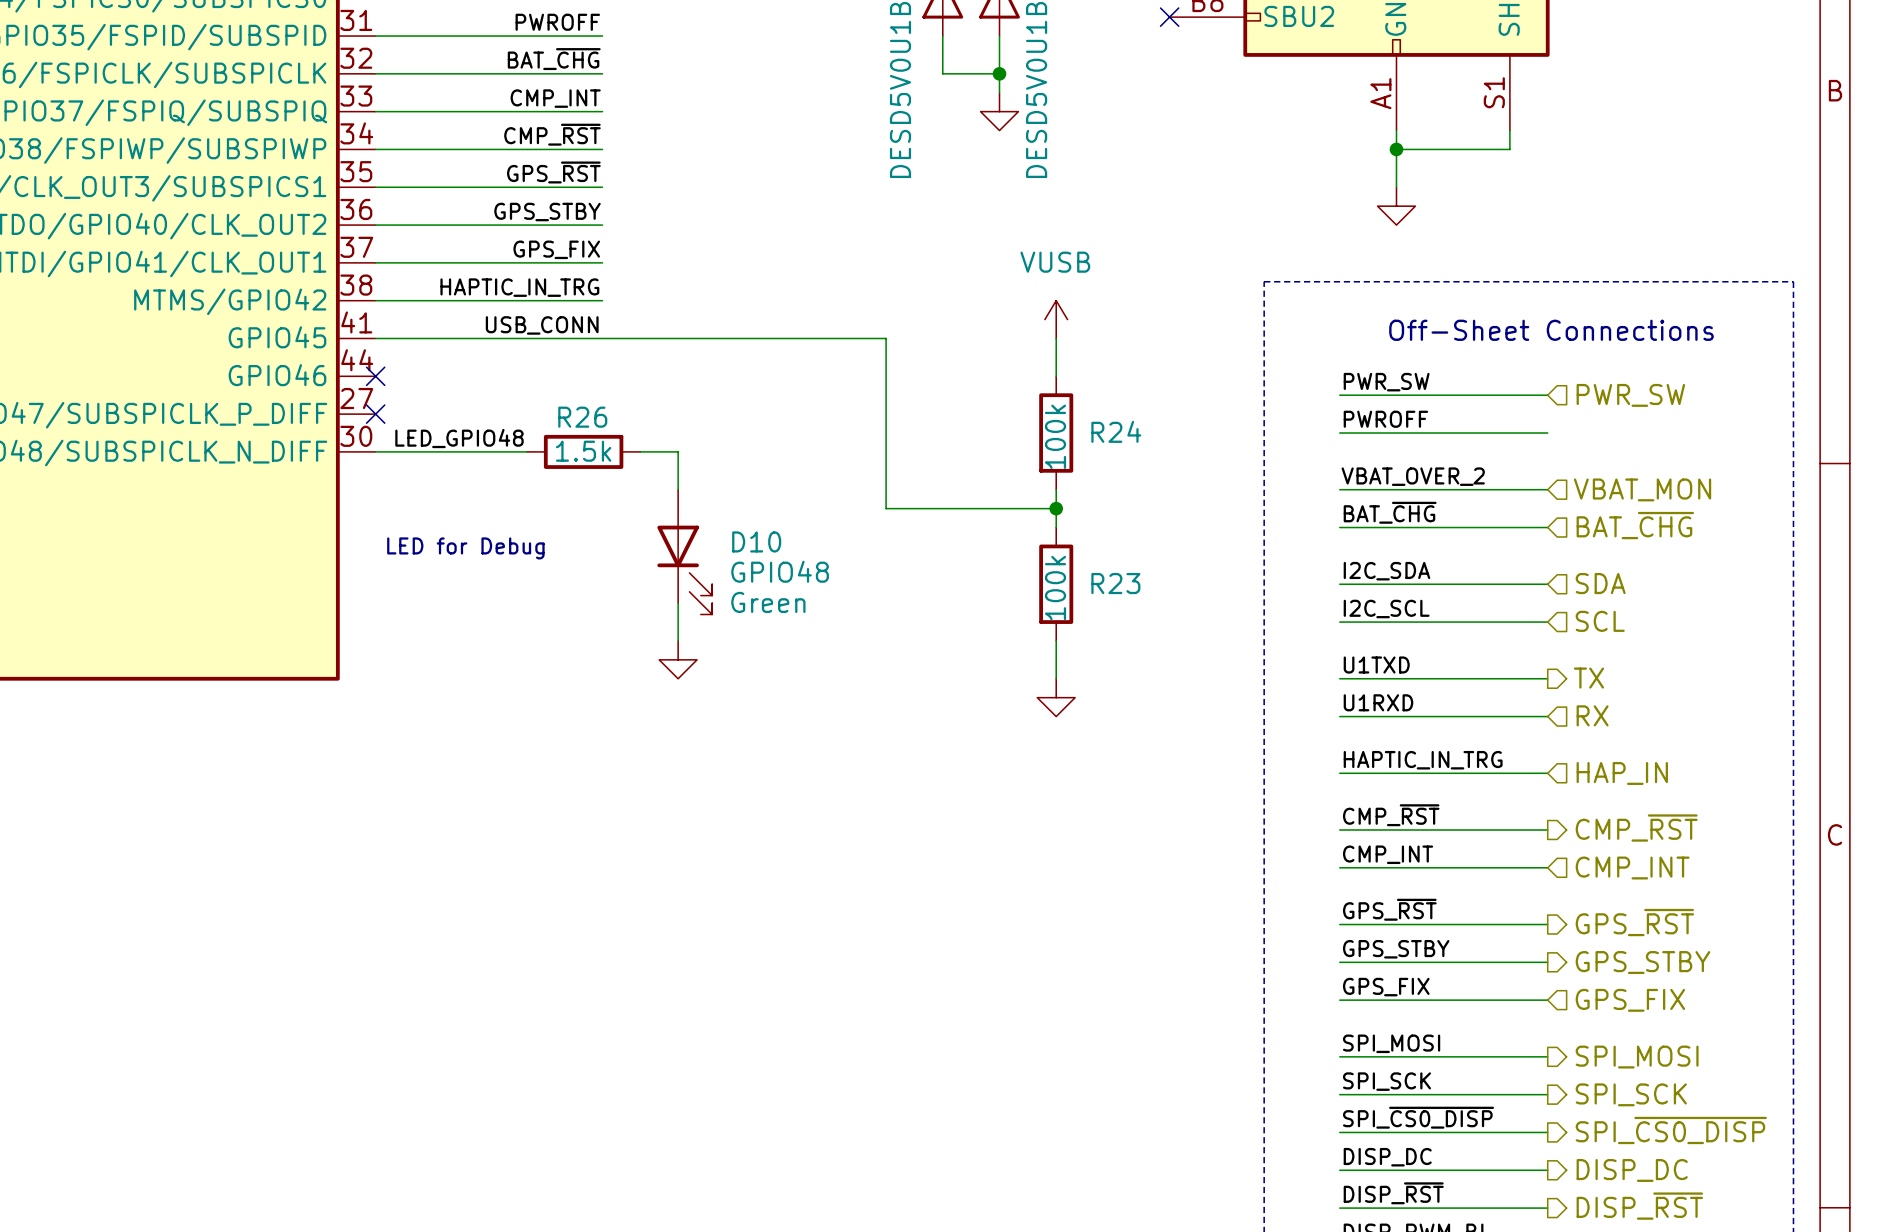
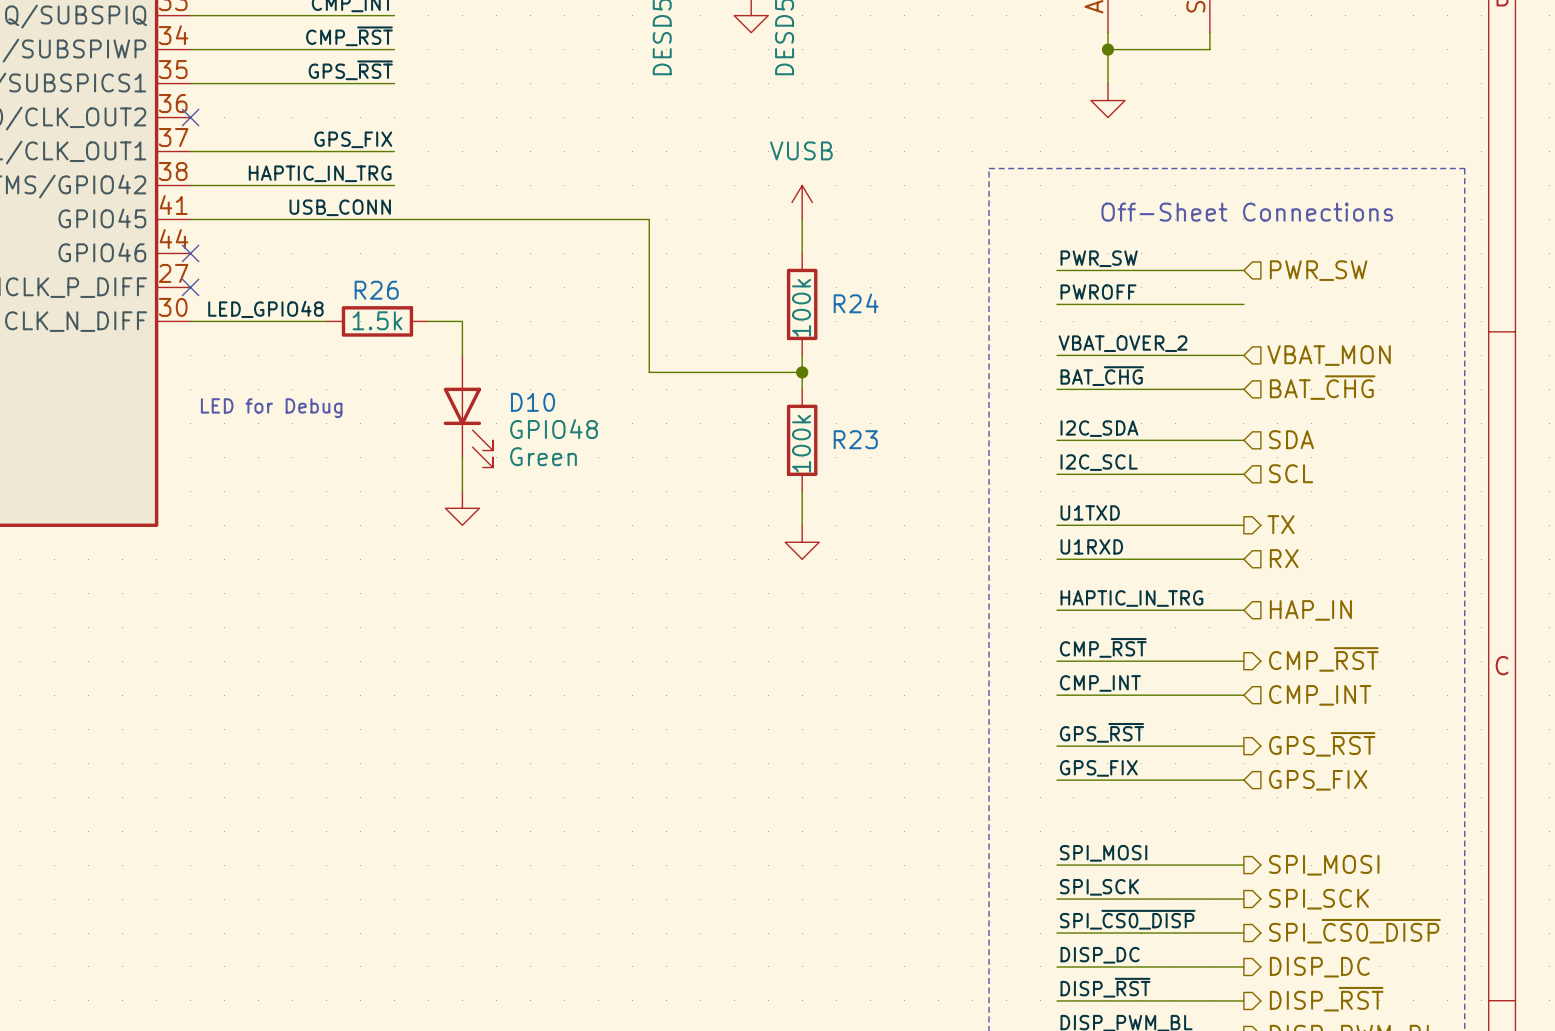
label: GPS_STBY (547, 212) -> none
wire: (375, 225) (602, 225) -> none
no-connect mark: none -> (190, 117)
label: GPS_STBY (1396, 949) -> GPS_FIX (1098, 768)
hierarchical label shape: output (1642, 962) -> input (1318, 780)
hierarchical label: GPS_STBY (1642, 962) -> GPS_FIX (1318, 780)
label: GPS_FIX (1386, 987) -> none
wire: (1339, 1000) (1547, 1000) -> none
hierarchical label: GPS_FIX (1630, 1000) -> none

